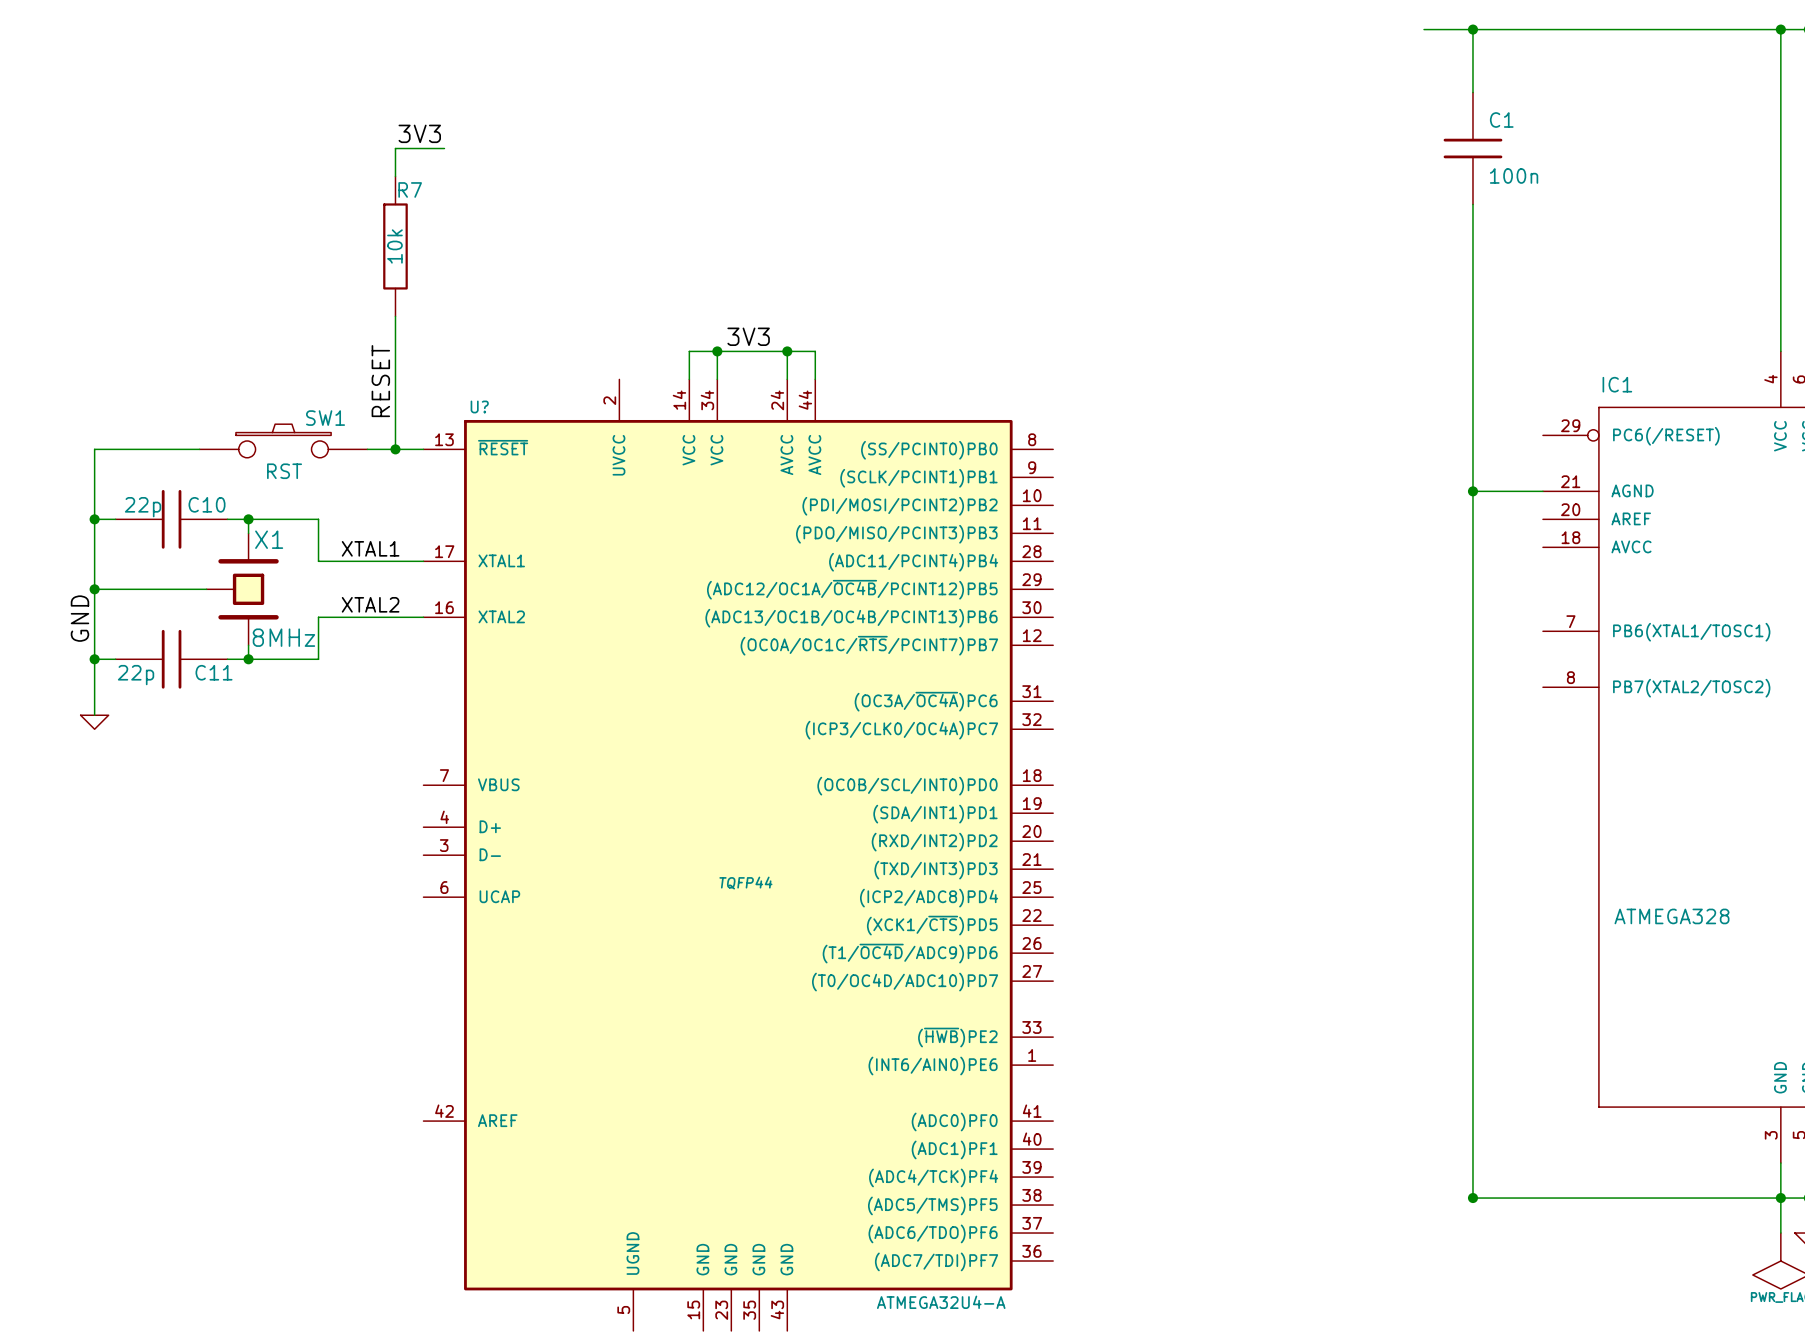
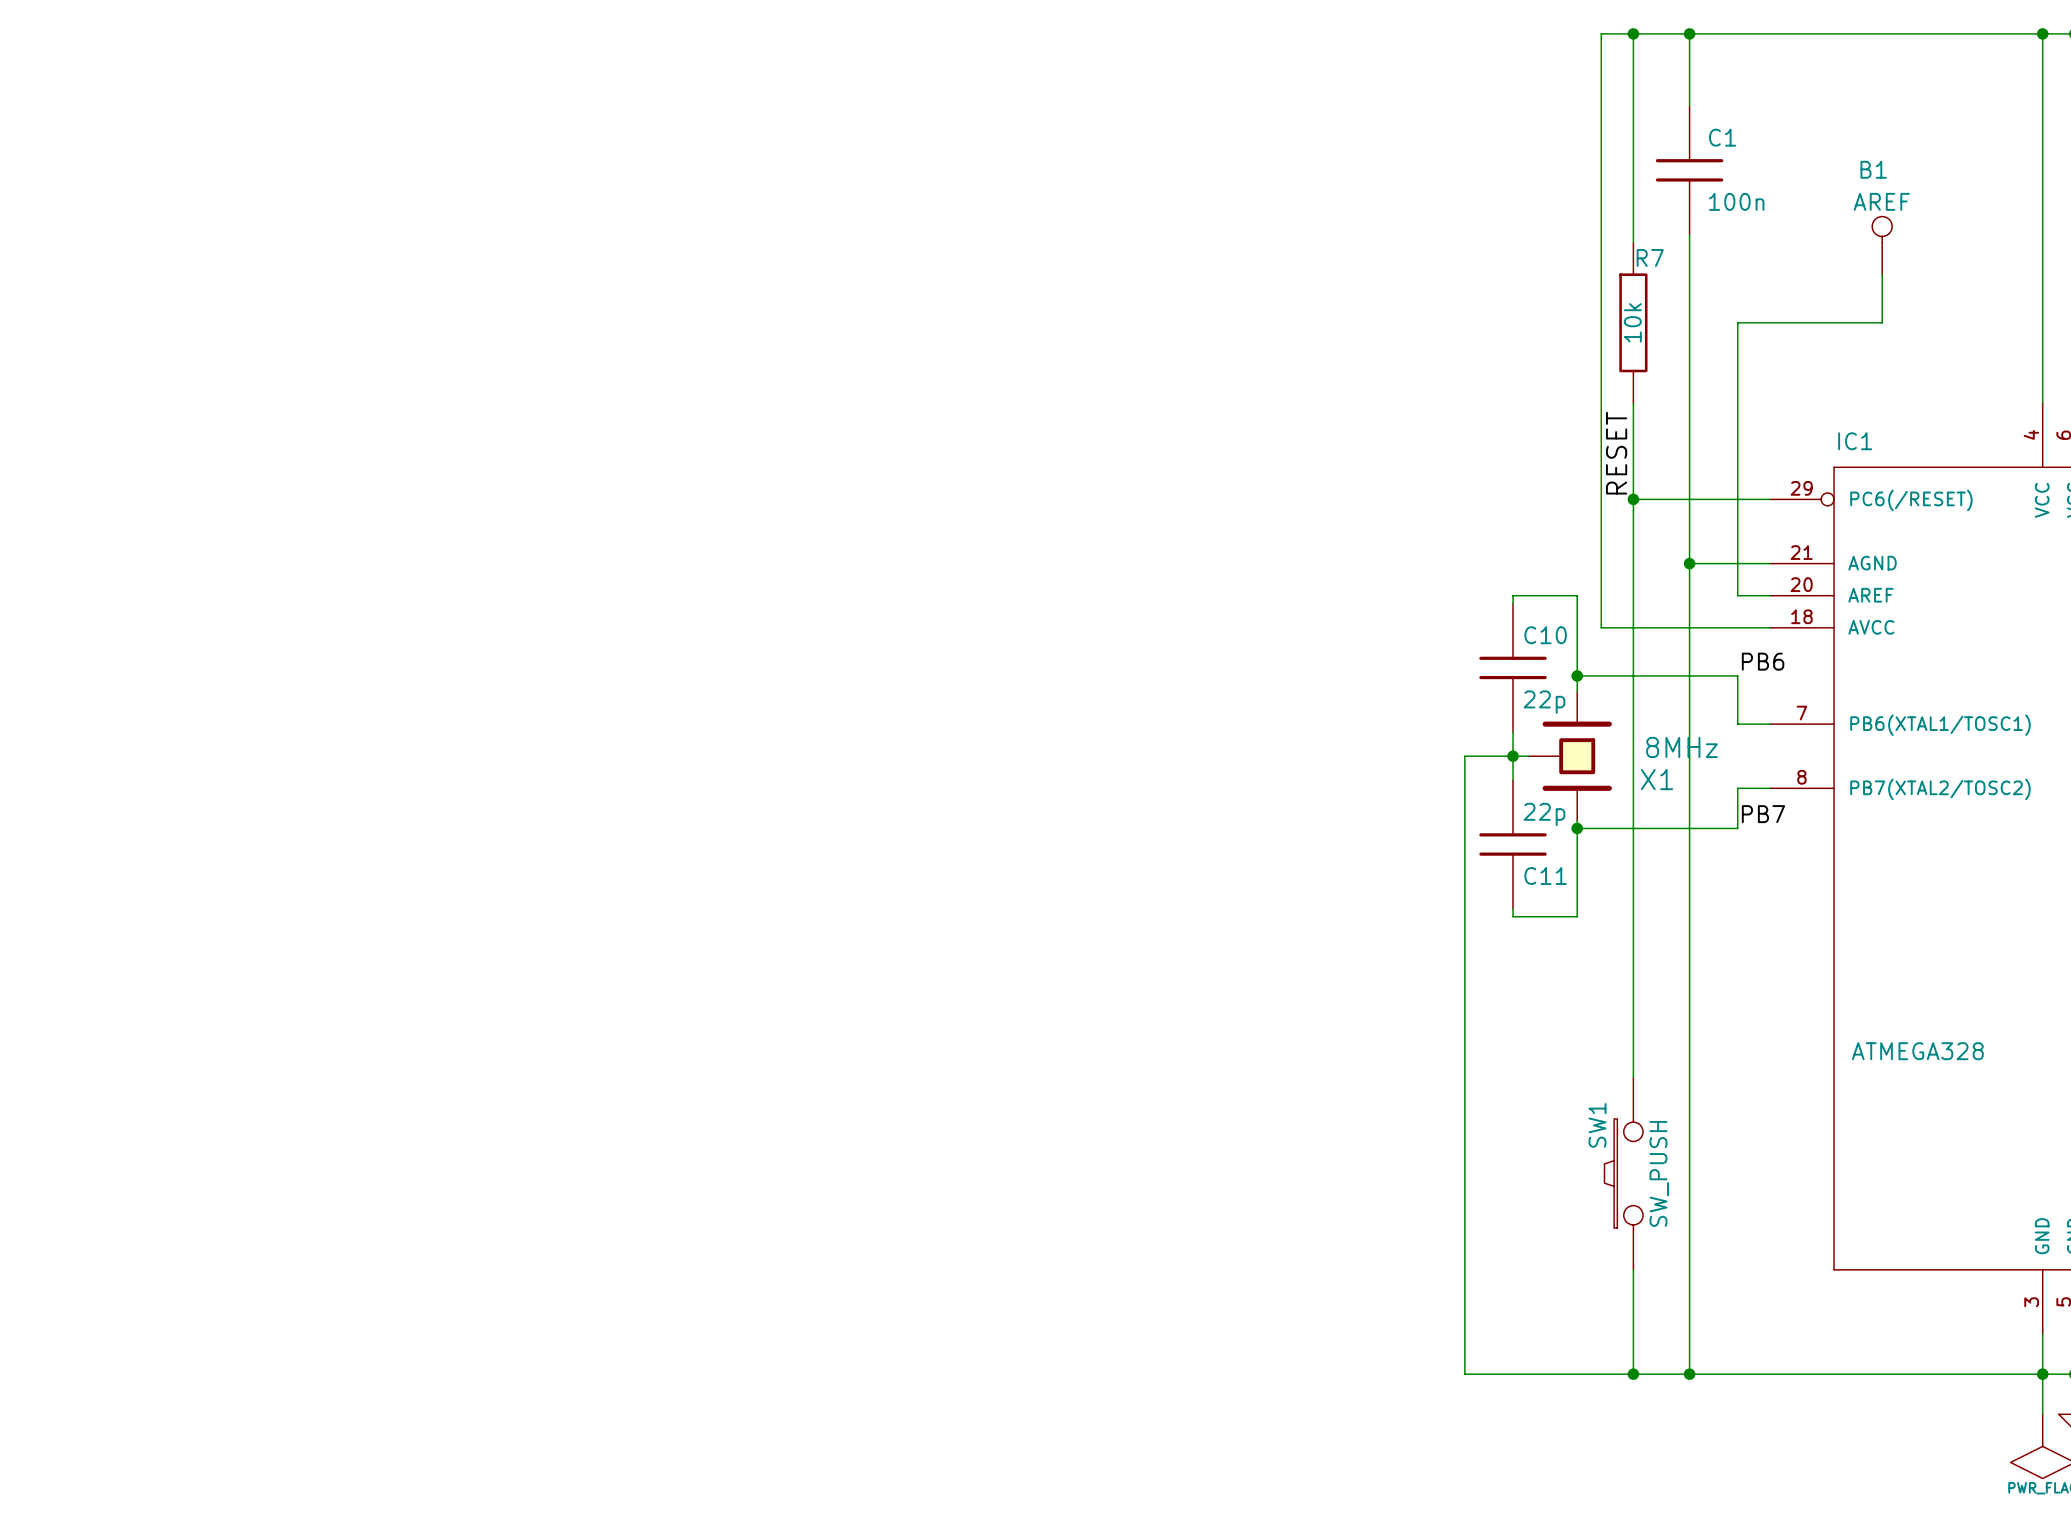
junction: none -> (1633, 33)
label: 3V3 (419, 133) -> none
wire: (444, 148) (395, 148) (395, 176) -> none
wire: none -> (1633, 242) (1633, 33) (1601, 33) (1601, 627) (1769, 627)
B1: none -> AREF (1882, 245)
wire: none -> (1882, 274) (1882, 322) (1737, 322) (1737, 595) (1769, 595)
R7 position: (395, 246) -> (1633, 322)
wire: (395, 316) (395, 449) -> none
label: 3V3 (748, 336) -> none
wire: (717, 351) (717, 379) -> none
junction: (717, 351) -> none
wire: (787, 351) (787, 379) -> none
junction: (787, 351) -> none
wire: none -> (1633, 403) (1633, 1077)
wire: (689, 379) (689, 351) (815, 351) (815, 379) -> none
label: RESET (380, 381) -> none
label: none -> RESET (1616, 453)
SW1 rotation: 0° (283, 429) -> 90° counterclockwise (1610, 1173)
wire: none -> (1633, 499) (1769, 499)
junction: none -> (1633, 499)
SW1 position: (283, 440) -> (1623, 1173)
wire: (199, 449) (94, 449) (94, 715) -> none
wire: (367, 449) (423, 449) -> none
junction: (395, 449) -> none
SW1 value: RST (284, 471) -> SW_PUSH (1659, 1173)
C10 value position: 22p (143, 507) -> 22p (1544, 702)
wire: (94, 519) (115, 519) -> none
junction: (94, 519) -> none
C10 rotation: 0° (171, 519) -> 90° clockwise (1513, 667)
C10 position: (171, 519) -> (1513, 667)
wire: (227, 519) (318, 519) (318, 561) (423, 561) -> none
wire: (248, 519) (248, 533) -> none
junction: (248, 519) -> none
wire: none -> (1513, 603) (1513, 595) (1577, 595) (1577, 692)
X1 name position: X1 (269, 539) -> X1 (1657, 779)
label: XTAL1 (370, 548) -> none
label: none -> PB6 (1763, 661)
wire: (94, 589) (206, 589) -> none
junction: (94, 589) -> none
X1 position: (242, 589) -> (1570, 756)
wire: none -> (1577, 675) (1737, 675) (1737, 724) (1769, 724)
junction: none -> (1577, 675)
label: XTAL2 (370, 604) -> none
wire: (423, 617) (318, 617) (318, 659) (227, 659) -> none
label: GND (79, 618) -> none
X1 value position: 8MHz (283, 637) -> 8MHz (1682, 747)
wire: none -> (1513, 732) (1513, 780)
wire: (248, 645) (248, 659) -> none
wire: (94, 659) (115, 659) -> none
junction: (94, 659) -> none
C11 rotation: 0° (171, 659) -> 90° clockwise (1513, 844)
C11 position: (171, 659) -> (1513, 844)
junction: (248, 659) -> none
junction: none -> (1513, 756)
wire: none -> (1529, 756) (1464, 756) (1464, 1374) (1689, 1374)
C11 value position: 22p (136, 675) -> 22p (1544, 814)
wire: none -> (1769, 788) (1737, 788) (1737, 828) (1577, 828)
label: none -> PB7 (1763, 814)
wire: none -> (1577, 820) (1577, 916) (1513, 916) (1513, 908)
power symbol: (94, 722) -> none
junction: none -> (1577, 828)
U?: ATMEGA32U4-A (738, 855) -> none
wire: none -> (1633, 1269) (1633, 1374)
junction: none -> (1633, 1374)

